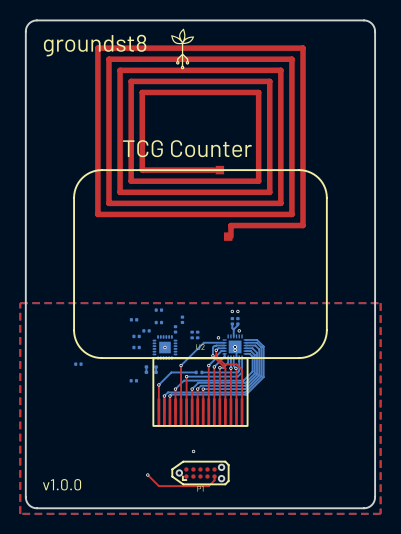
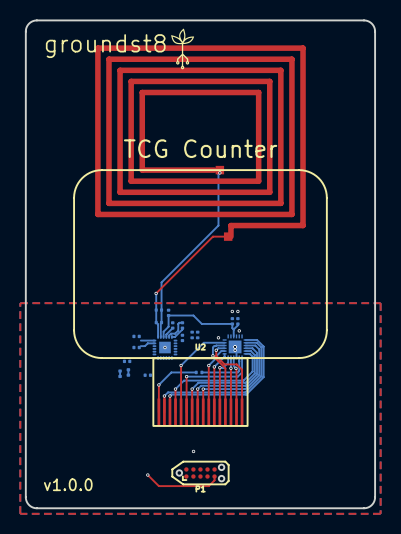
bottom track: none -> (219, 172) (218, 225) (161, 282) (160, 336)
via: none -> (219, 172)
top track: none -> (226, 236) (212, 236) (156, 293)
bottom track: none -> (156, 293) (158, 336)
via: none -> (156, 293)
part: none -> (168, 312)
bottom track: none -> (168, 315) (193, 315) (201, 323) (232, 323)
bottom track: none -> (168, 316) (168, 326) (163, 331) (163, 336)
part: (134, 319) -> none
part: (182, 319) -> none
bottom track: none -> (182, 322) (178, 323) (178, 330) (175, 333) (170, 333) (169, 336)
part: none -> (172, 325)
part: none -> (182, 325)
bottom track: none -> (172, 328) (166, 336)
bottom track: none -> (182, 328) (174, 336) (171, 336)
part: (175, 329) -> none
part: (146, 330) -> none
part: none -> (182, 337)
bottom track: none -> (140, 340) (154, 340)
bottom track: none -> (154, 343) (140, 346)
part: none -> (127, 361)
part: (78, 364) -> none
part: (146, 369) -> none
part: (156, 369) -> none
part: none -> (128, 372)
part: none -> (120, 373)
part: none -> (147, 375)
part: (133, 380) -> none

